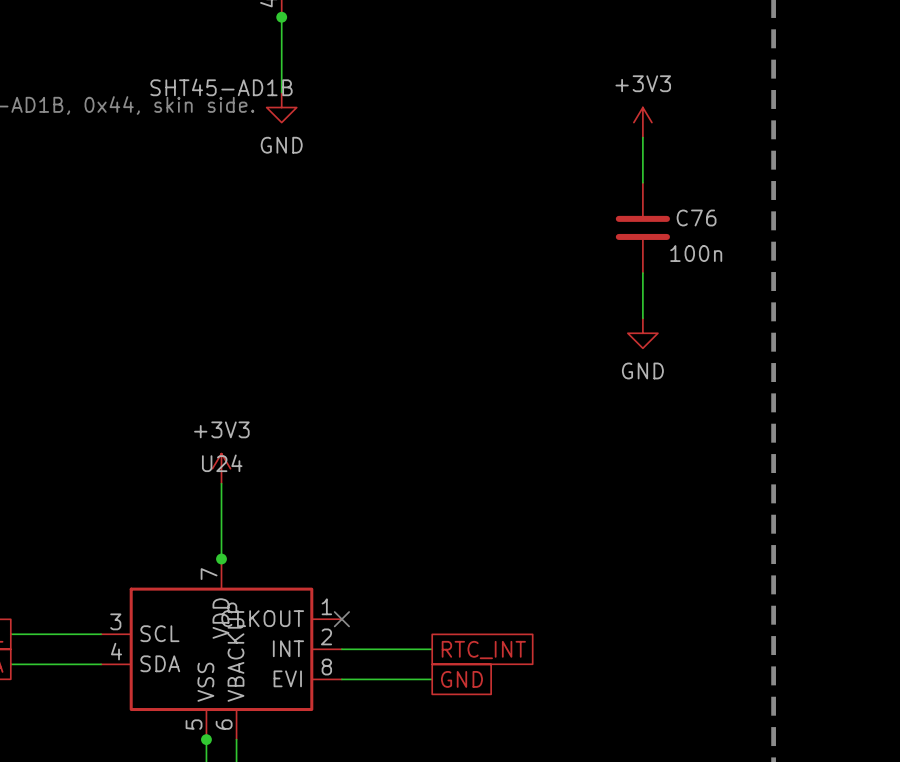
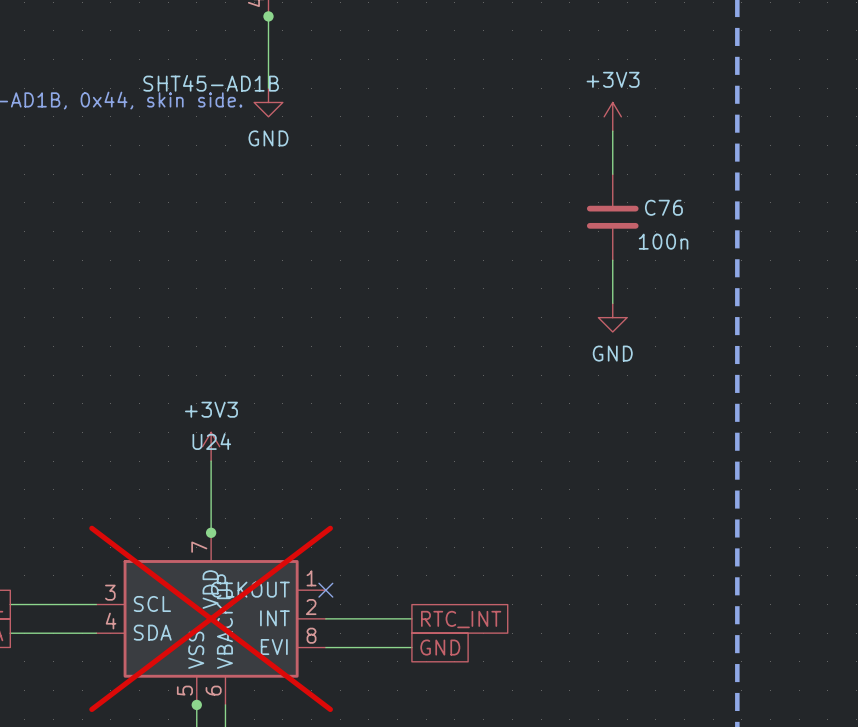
U24 do-not-place cross: none -> (211, 618)

